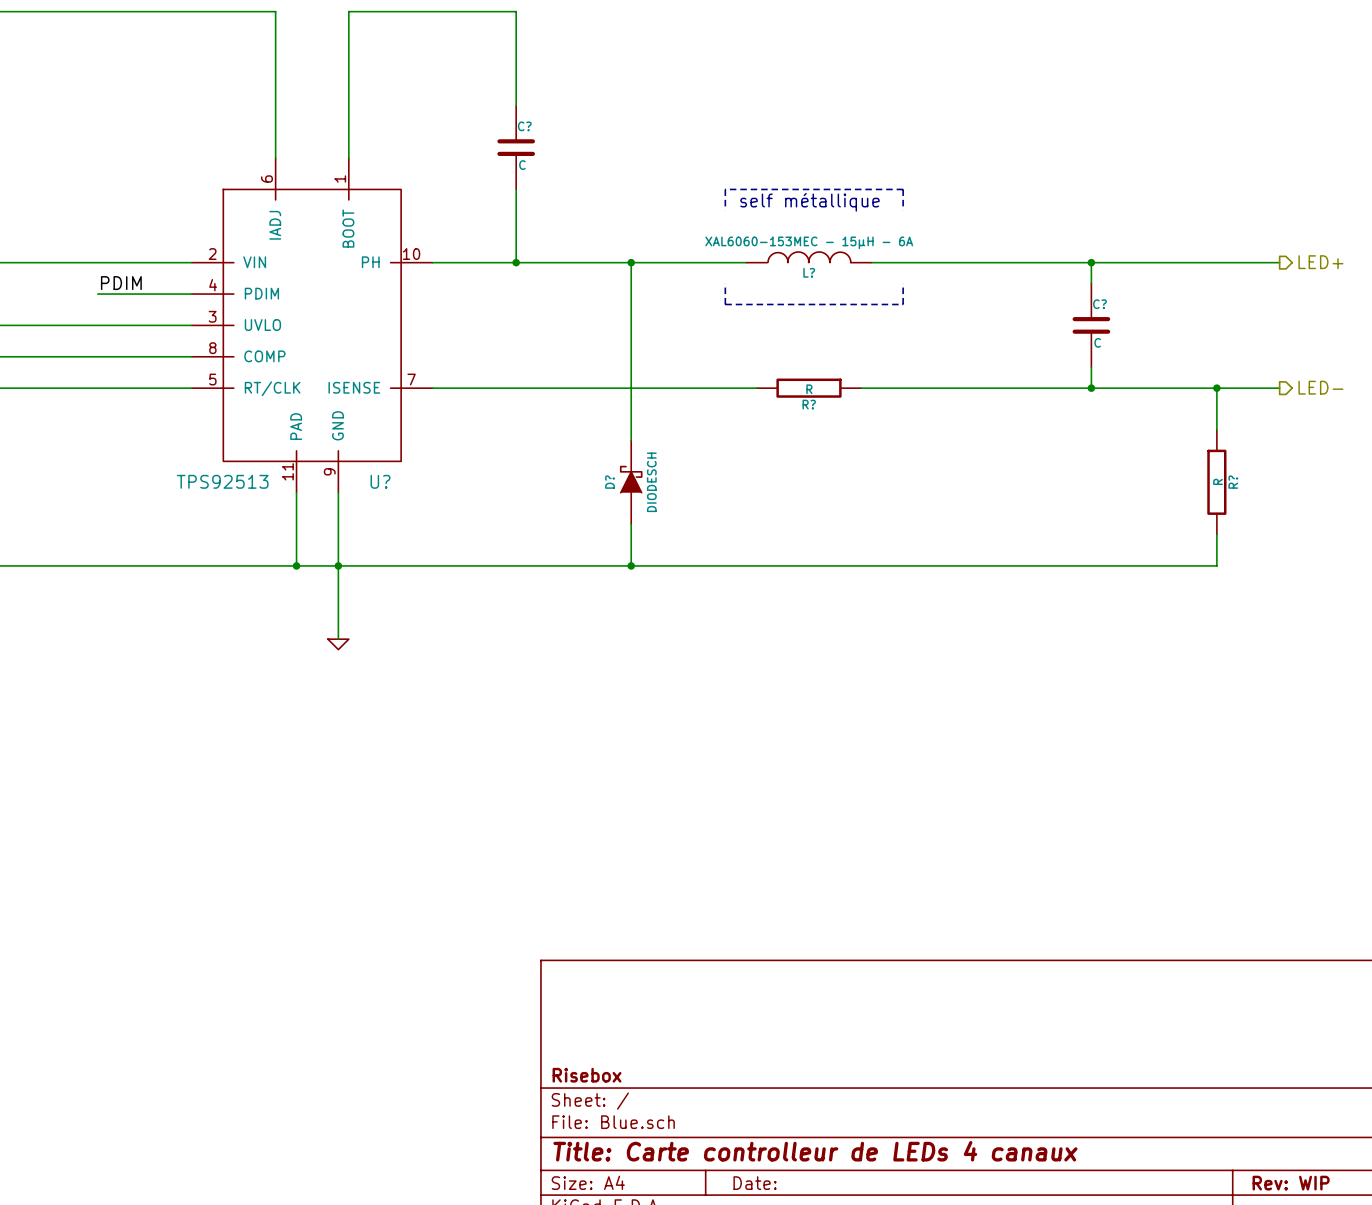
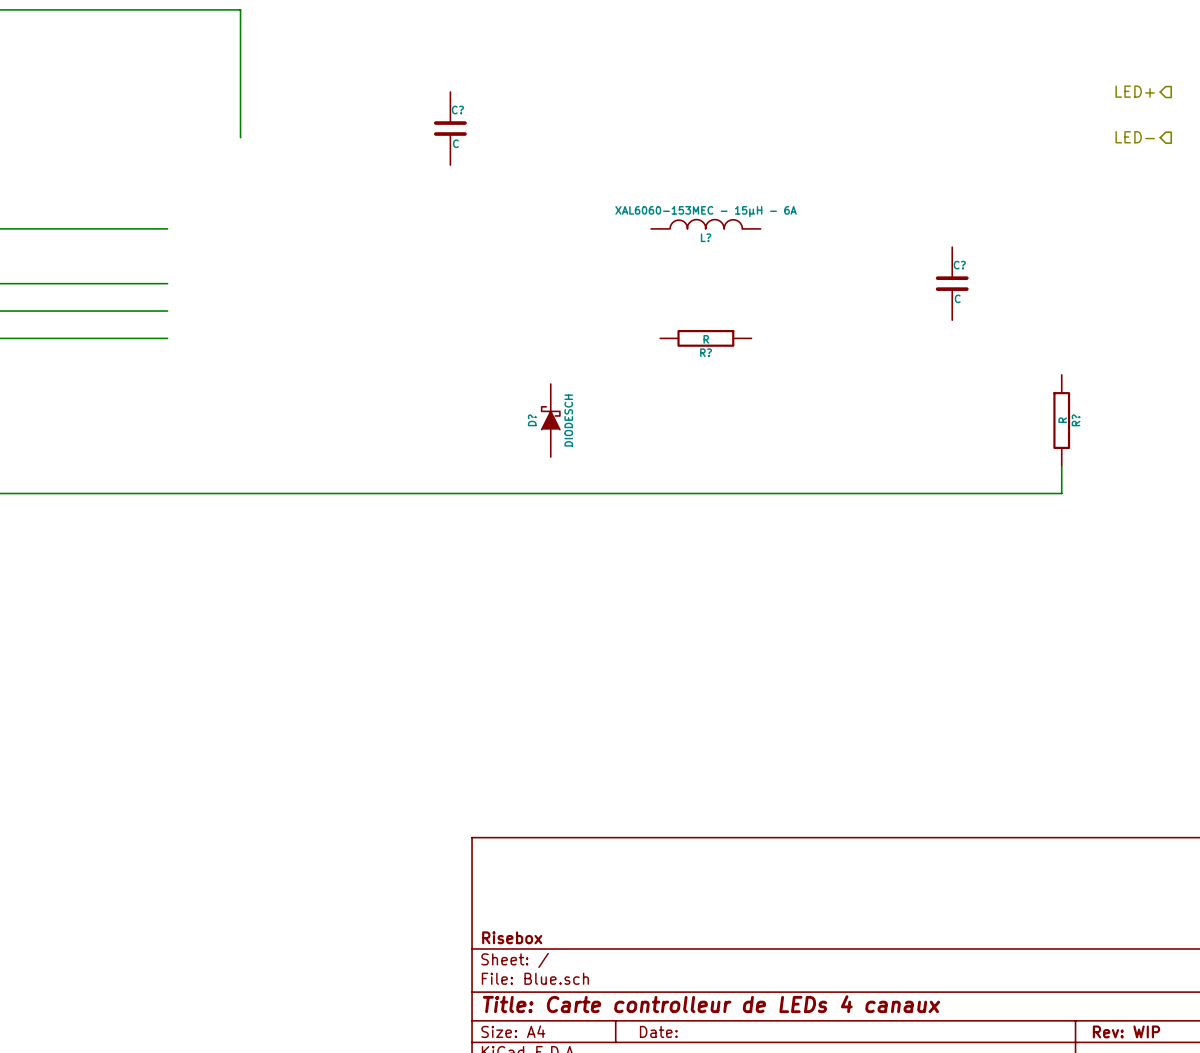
wire: (516, 105) (516, 11) (348, 11) (348, 158) -> none
hierarchical label: none -> LED- (1135, 137)
wire: (516, 189) (516, 262) -> none
text: self métallique (809, 202) -> none
line: (725, 210) (725, 189) (903, 189) (903, 210) -> none
wire: (432, 262) (746, 262) -> none
junction: (516, 262) -> none
wire: (631, 262) (631, 440) -> none
junction: (631, 262) -> none
wire: (871, 262) (1279, 262) -> none
wire: (1091, 262) (1091, 283) -> none
junction: (1091, 262) -> none
hierarchical label rotation: 0° (1320, 262) -> 180° (1135, 91)
hierarchical label position: LED+ (1320, 262) -> LED+ (1135, 91)
label: PDIM (121, 283) -> none
line: (725, 283) (725, 304) (903, 304) (903, 283) -> none
wire: (97, 294) (191, 294) -> none
U?: TPS92513 (312, 325) -> none
wire: (1091, 367) (1091, 388) -> none
hierarchical label: LED- (1320, 387) -> none
wire: (432, 388) (756, 388) -> none
wire: (861, 388) (1279, 388) -> none
junction: (1091, 388) -> none
wire: (1216, 388) (1216, 429) -> none
junction: (1216, 388) -> none
wire: (296, 492) (296, 565) -> none
wire: (338, 492) (338, 639) -> none
wire: (631, 524) (631, 565) -> none
junction: (296, 565) -> none
junction: (338, 565) -> none
junction: (631, 565) -> none
power symbol: (338, 644) -> none

